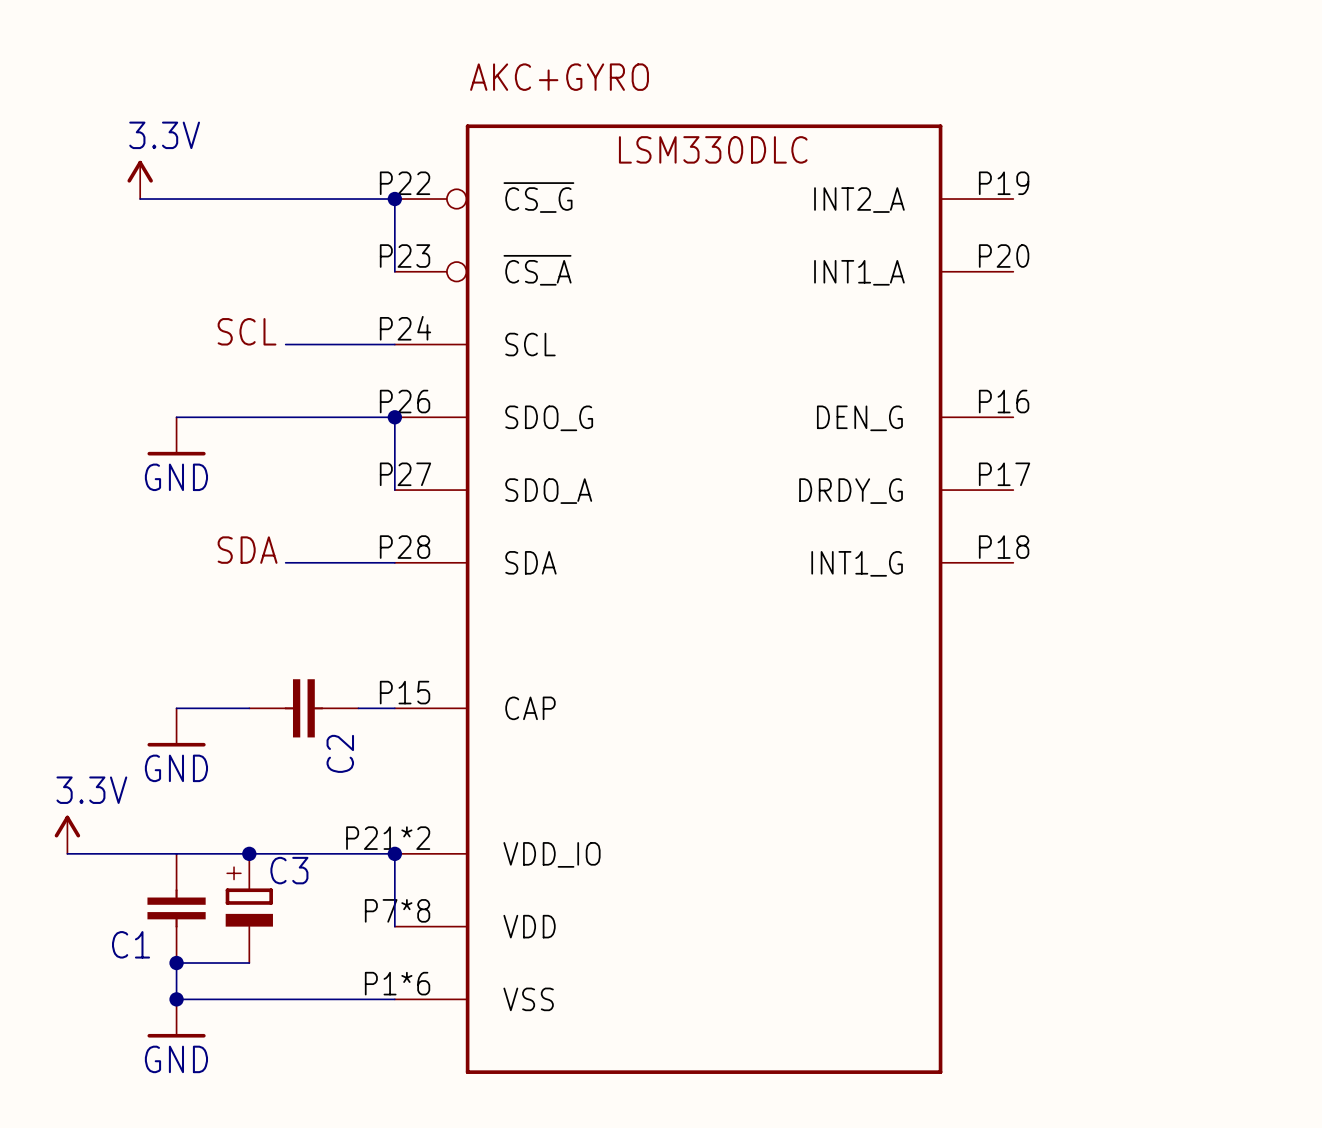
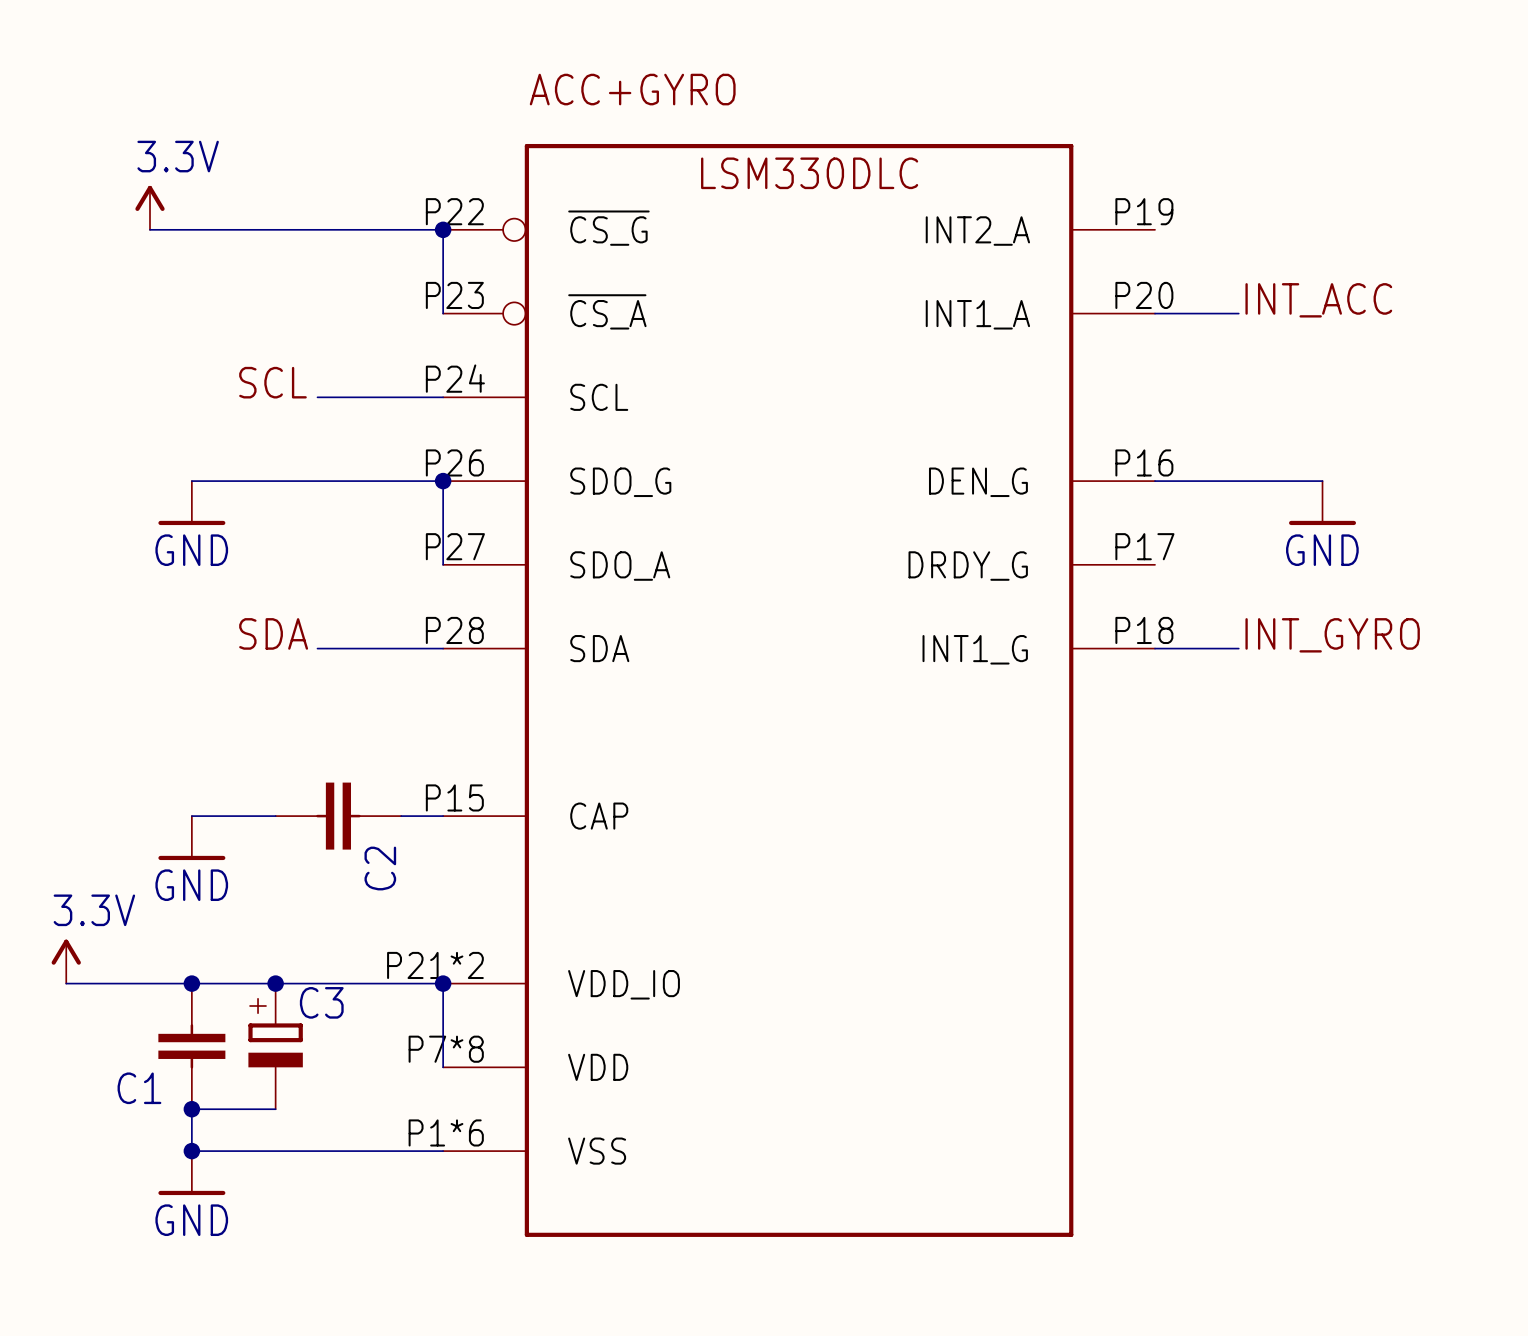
AKC+GYRO name: AKC+GYRO (559, 77) -> ACC+GYRO (632, 89)
label: none -> INT_ACC (1318, 300)
wire: none -> (1155, 313) (1238, 313)
wire: none -> (1155, 481) (1322, 481)
power symbol: none -> GND (1322, 503)
label: none -> INT_GYRO (1332, 635)
wire: none -> (1155, 648) (1238, 648)
junction: none -> (191, 983)

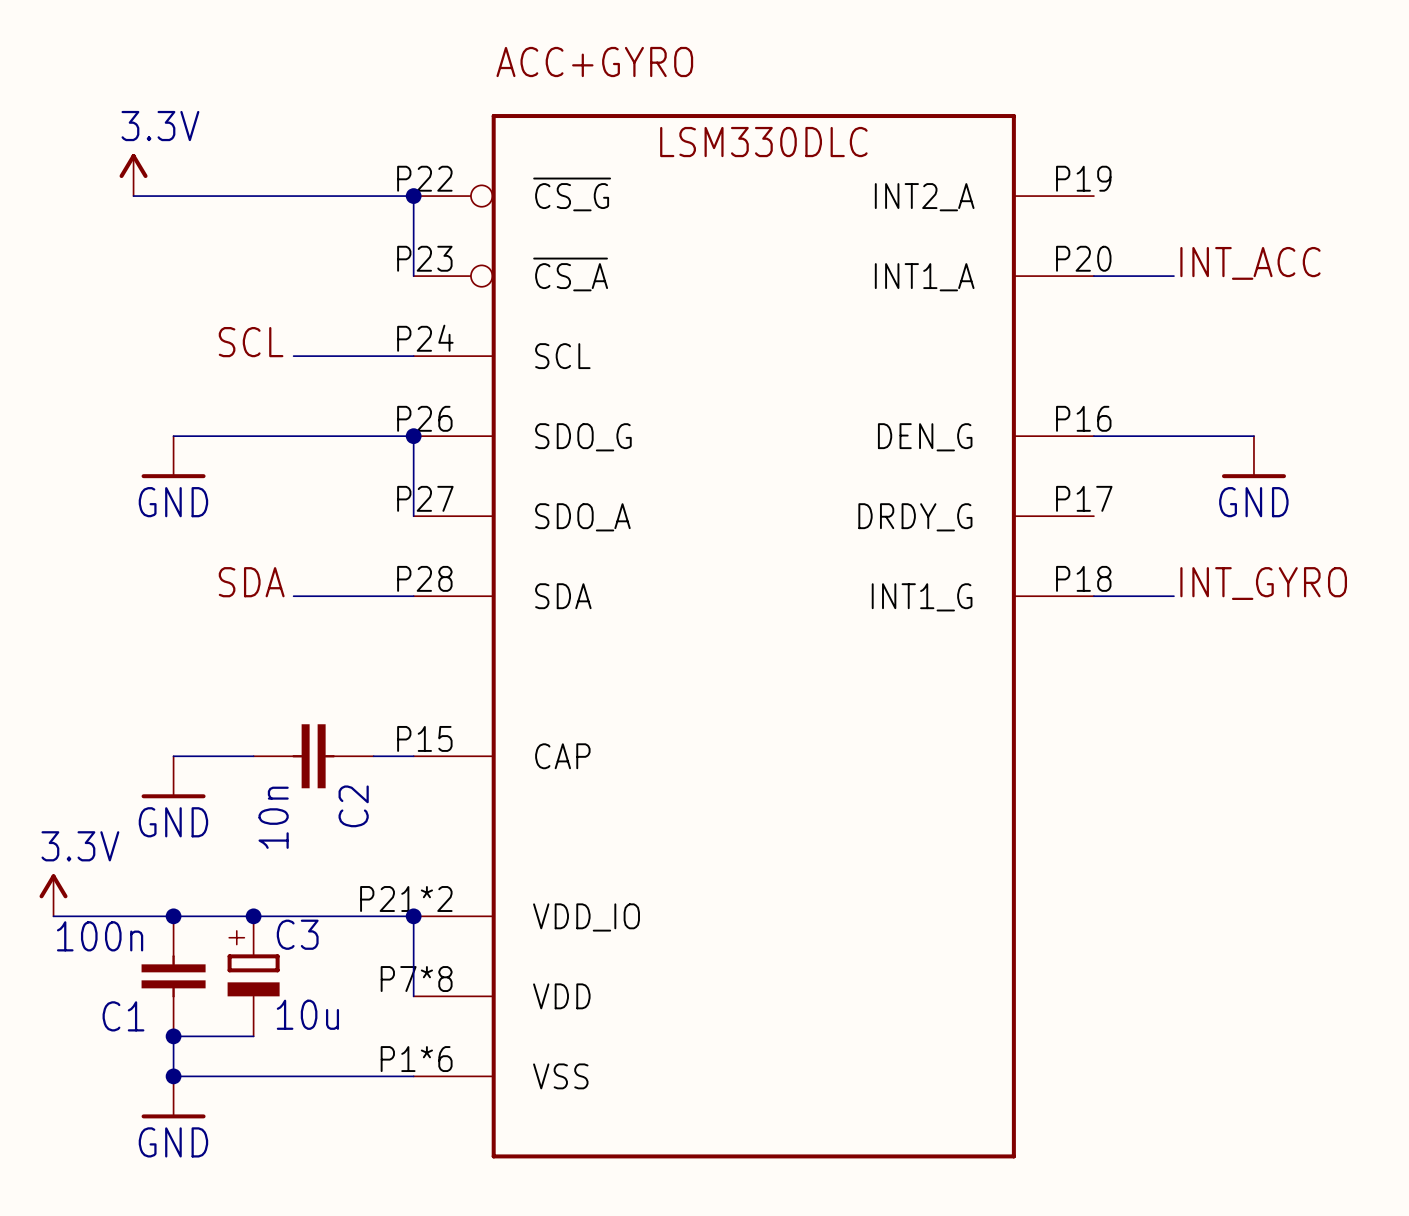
C2 value: none -> 10n (273, 817)
C1 value: none -> 100n (100, 936)
C3 value: none -> 10u (307, 1014)

